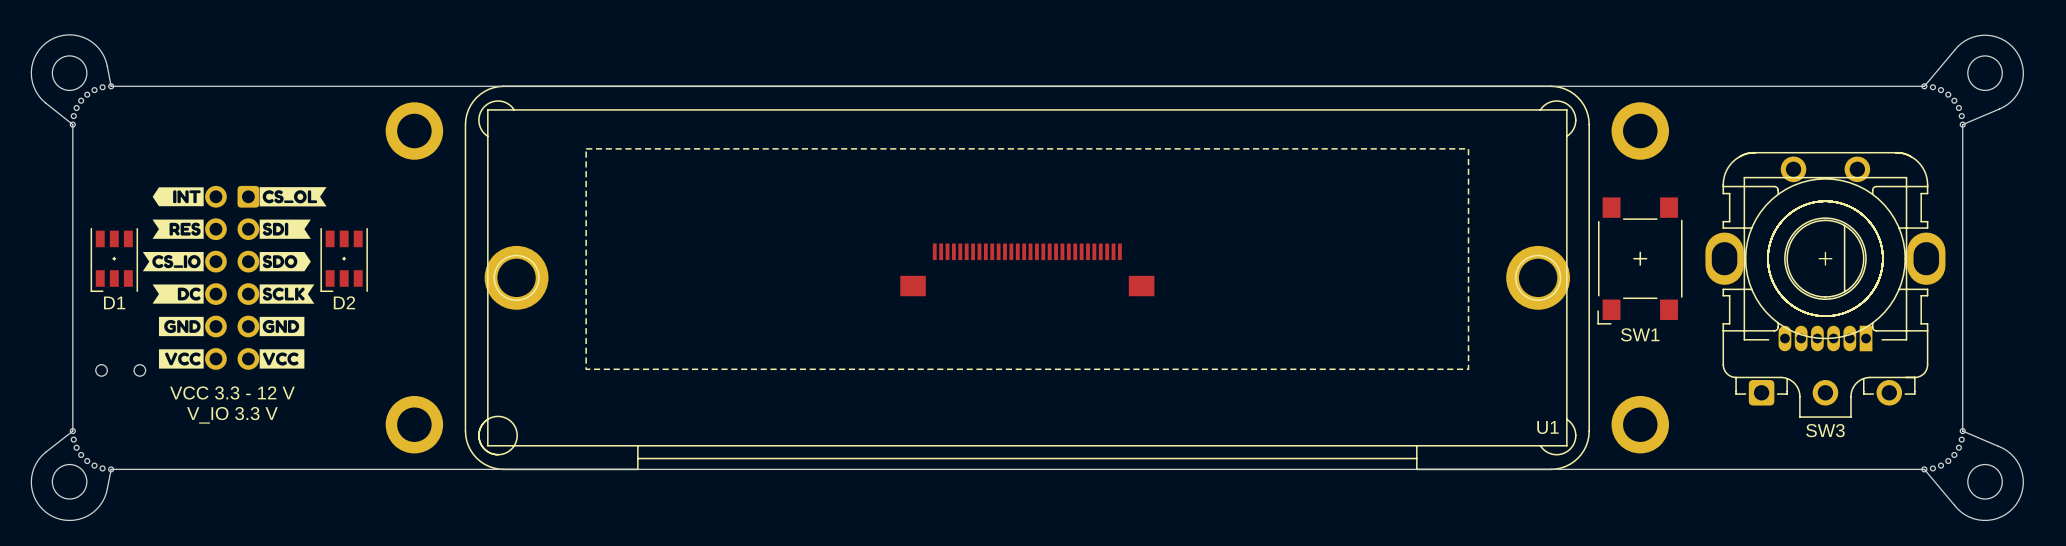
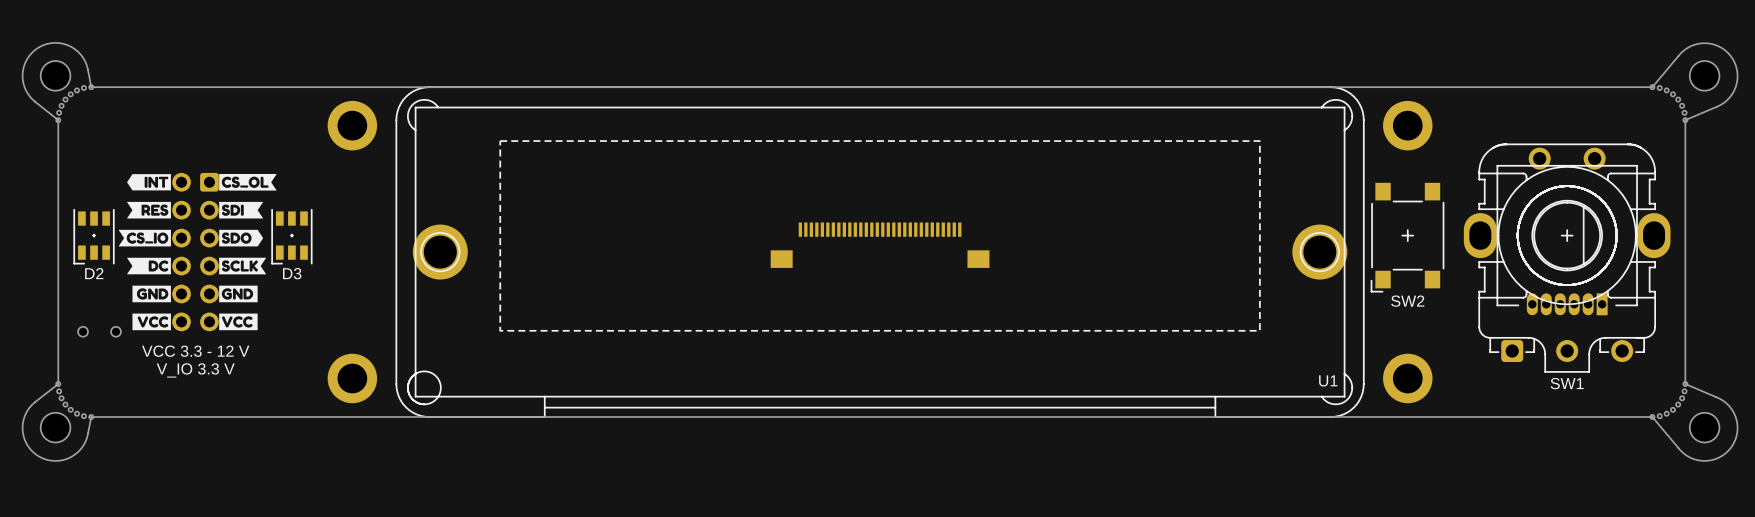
D1 name: D1 (114, 302) -> D2 (94, 273)
D2 name: D2 (344, 302) -> D3 (292, 273)
SW1 name: SW1 (1640, 334) -> SW2 (1407, 301)
SW3 name: SW3 (1825, 430) -> SW1 (1567, 383)

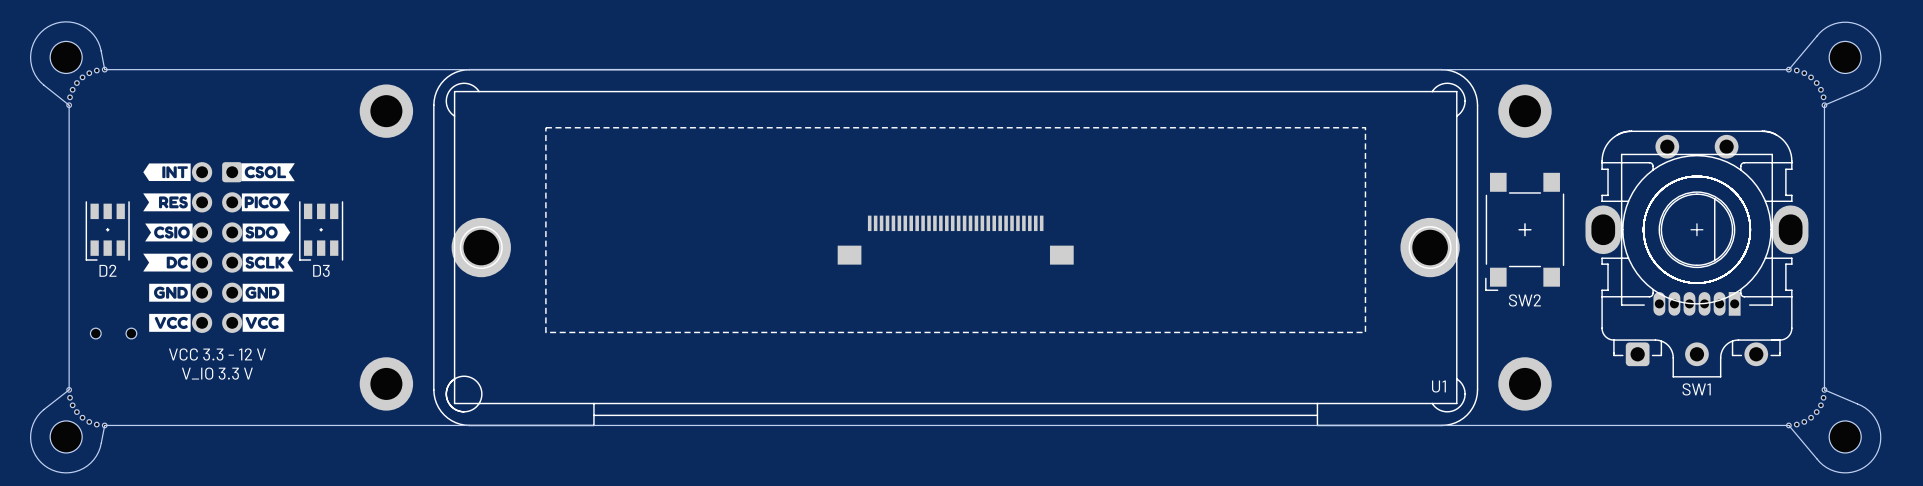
drawing shape: [219, 173, 277, 191] -> [241, 163, 295, 182]
drawing shape: [219, 201, 264, 219] -> [241, 193, 290, 212]
drawing shape: [118, 229, 171, 247] -> [145, 223, 193, 242]

